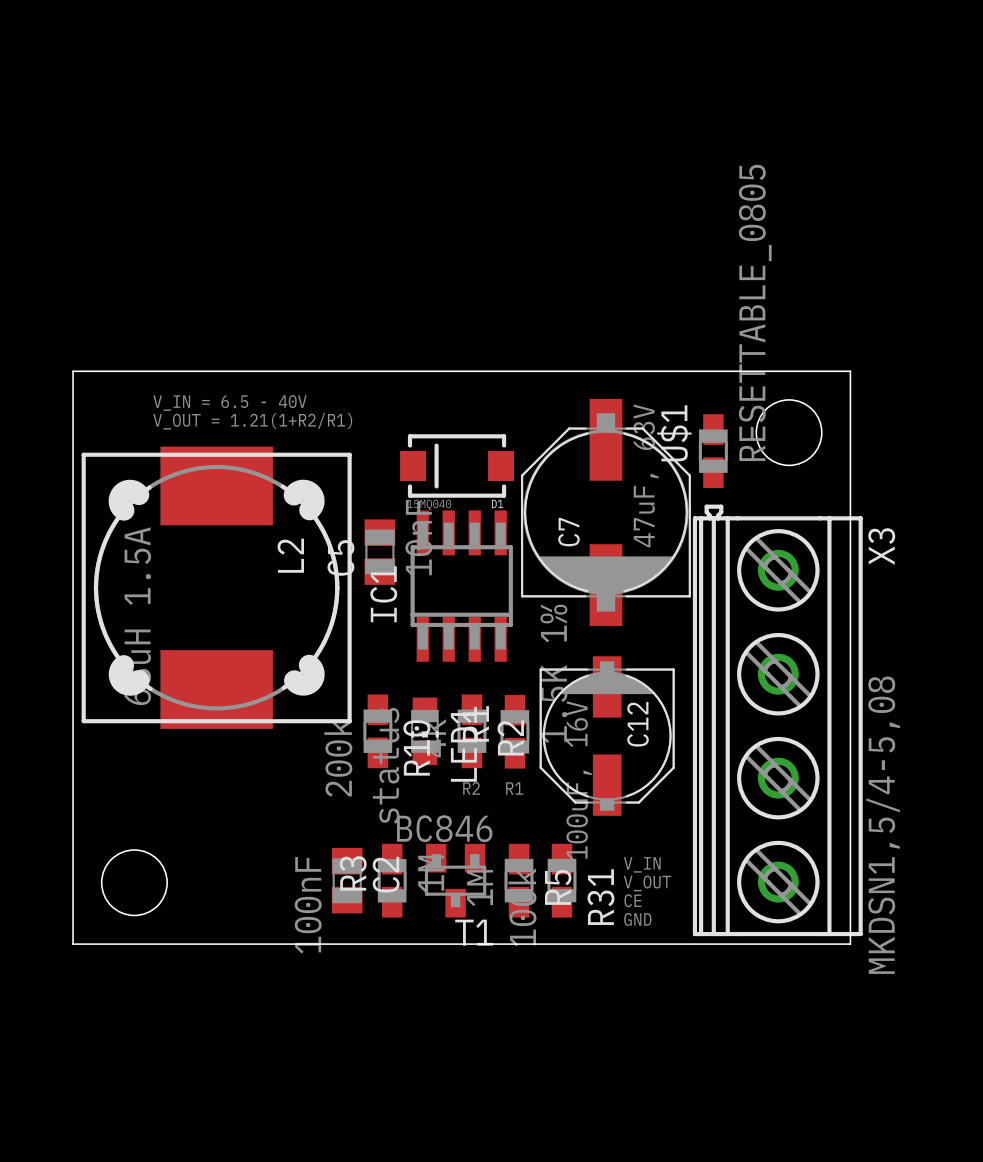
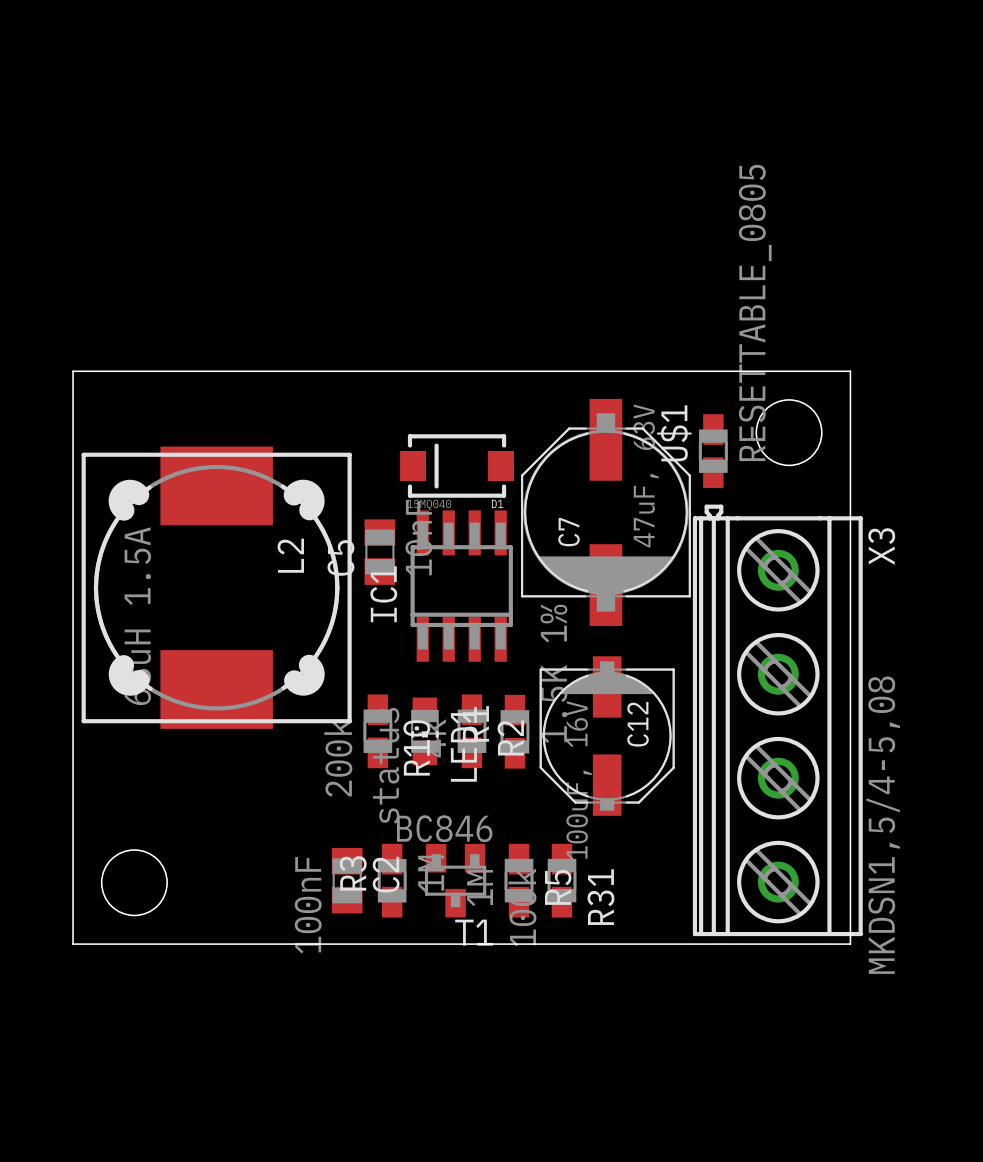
text: V_IN = 6.5 - 40V (230, 402) -> none
text: V_OUT = 1.21(1+R2/R1) (252, 421) -> none
text: R2 (471, 788) -> none
text: R1 (514, 788) -> none
text: V_IN (642, 864) -> none
text: V_OUT (647, 883) -> none
text: CE (632, 900) -> none
text: GND (637, 919) -> none

